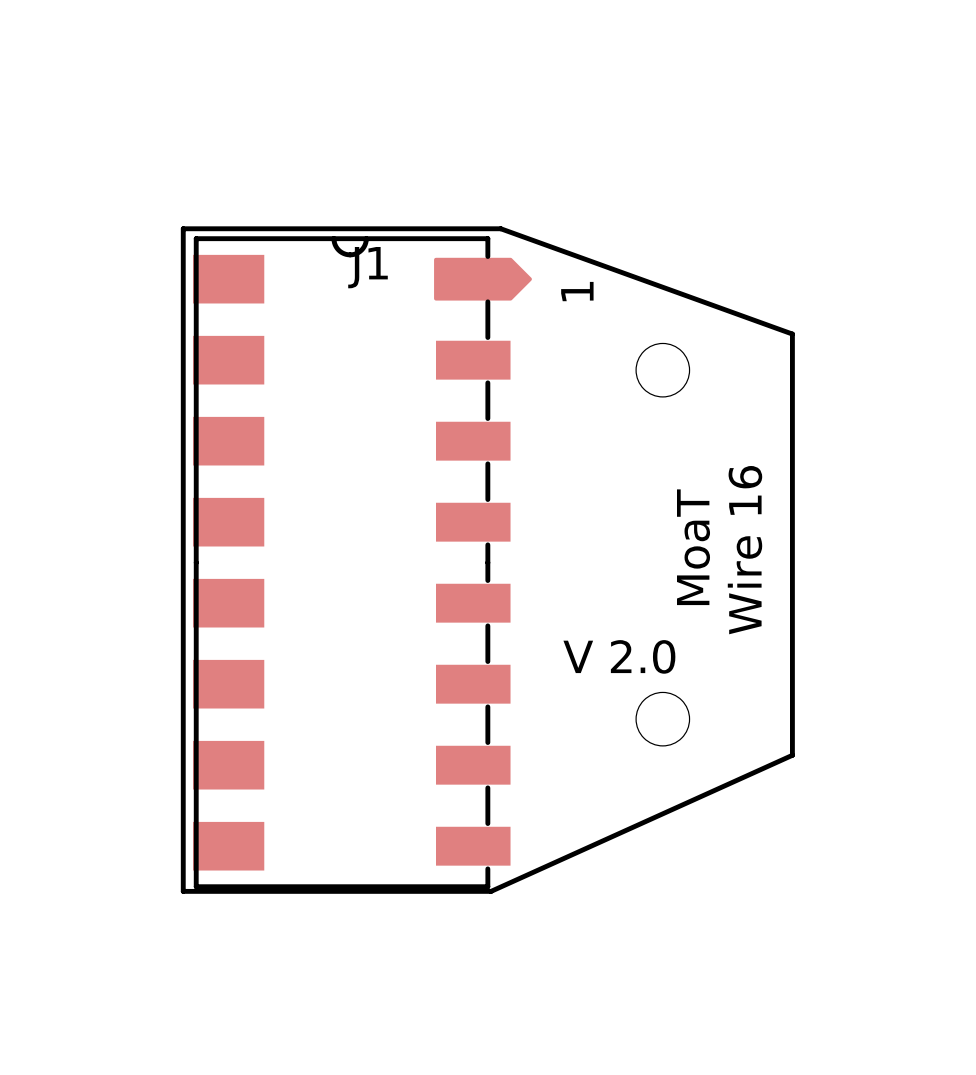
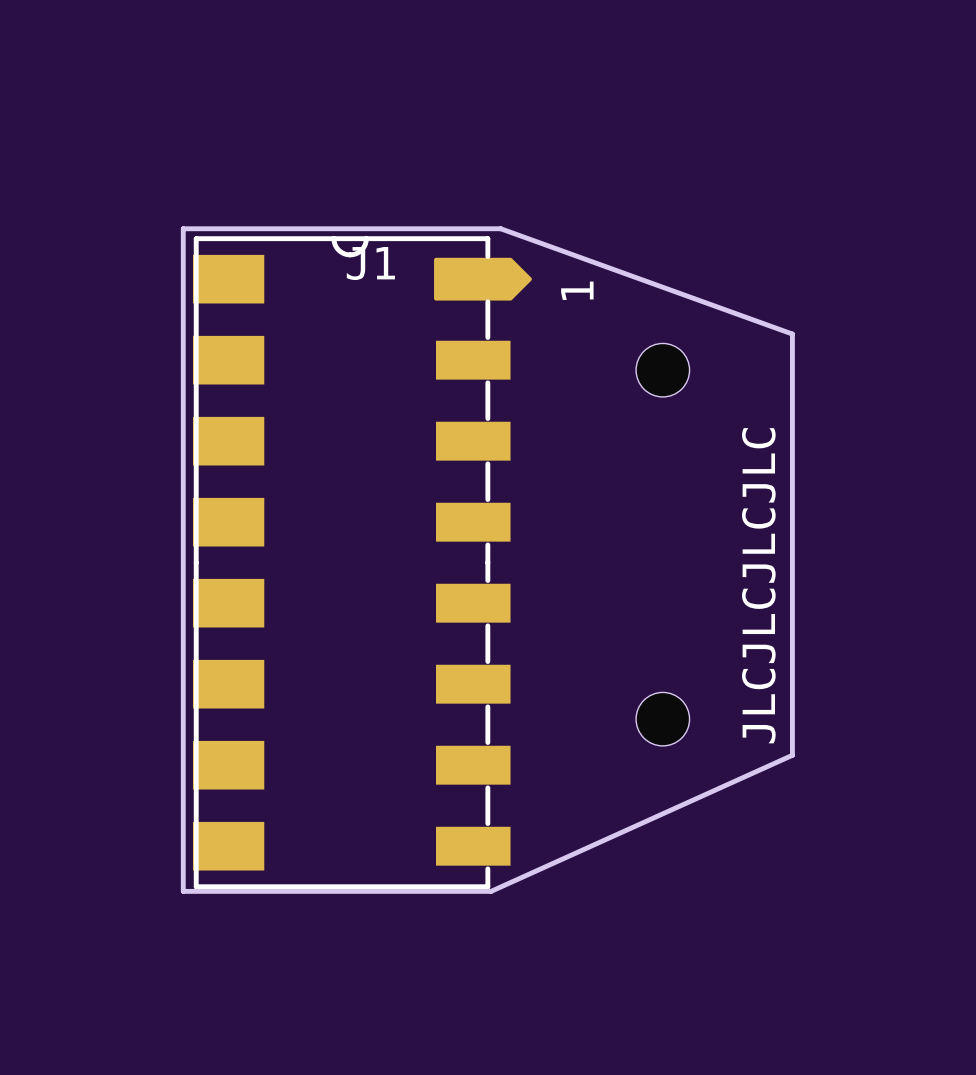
text: MoaT (693, 547) -> none
text: Wire 16 (745, 550) -> none
text: none -> JLCJLCJLCJLC (758, 585)
text: V 2.0 (619, 656) -> none

